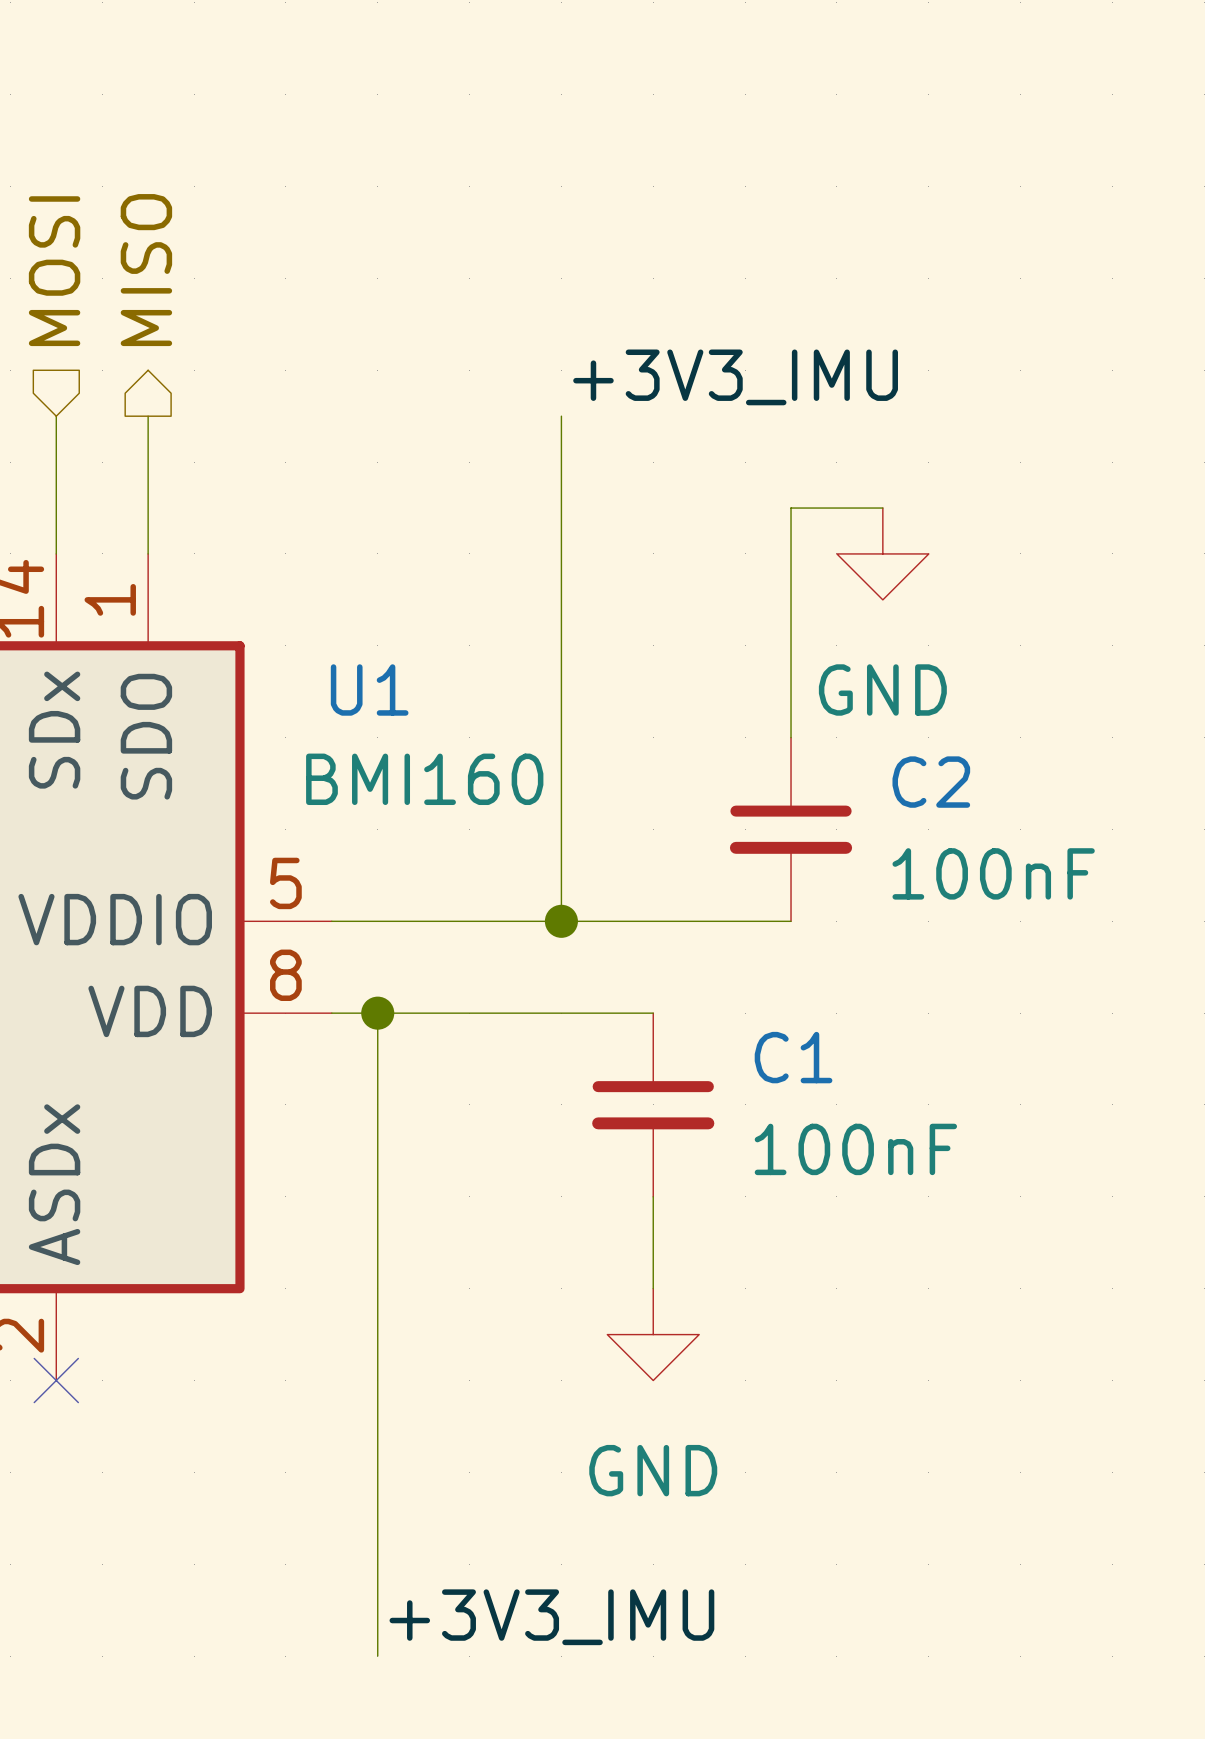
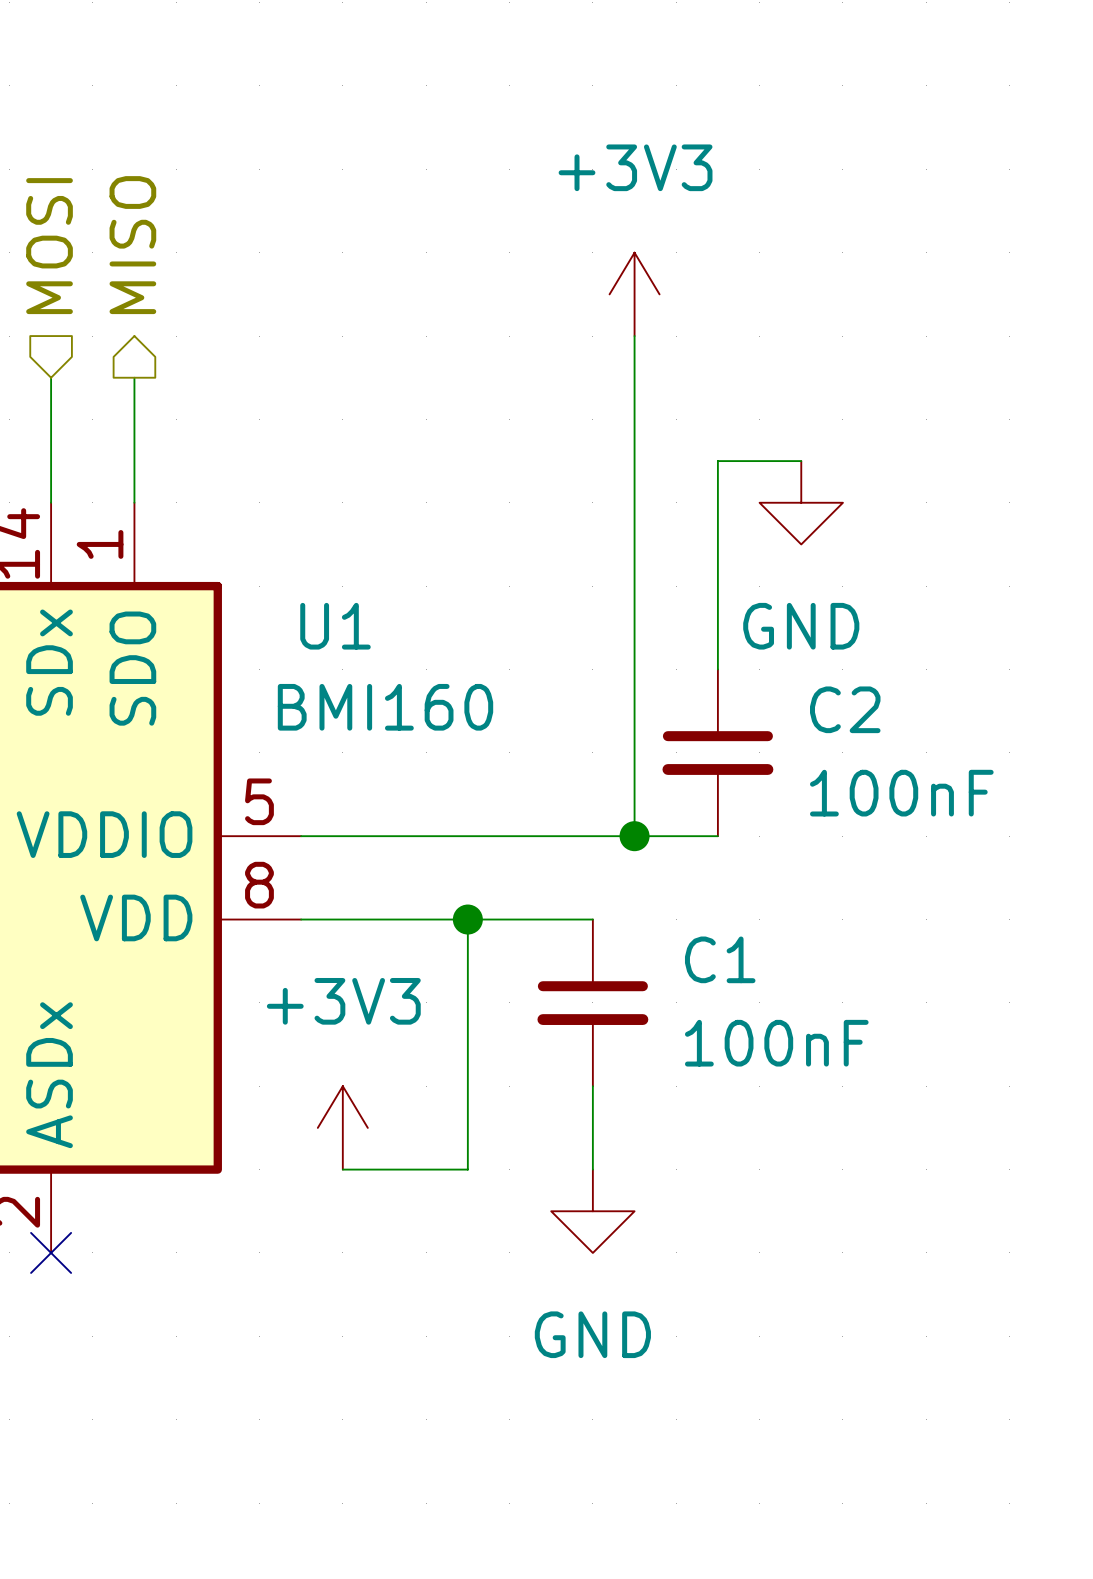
power symbol: none -> +3V3 (634, 294)
wire: none -> (634, 336) (634, 836)
label: +3V3_IMU (735, 377) -> none
wire: (561, 416) (561, 921) -> none
junction: (561, 921) -> none
junction: none -> (634, 836)
wire: (377, 1013) (377, 1656) -> none
junction: (377, 1013) -> none
wire: none -> (467, 919) (467, 1169) (342, 1169)
junction: none -> (467, 919)
power symbol: none -> +3V3 (342, 1127)
label: +3V3_IMU (551, 1617) -> none

